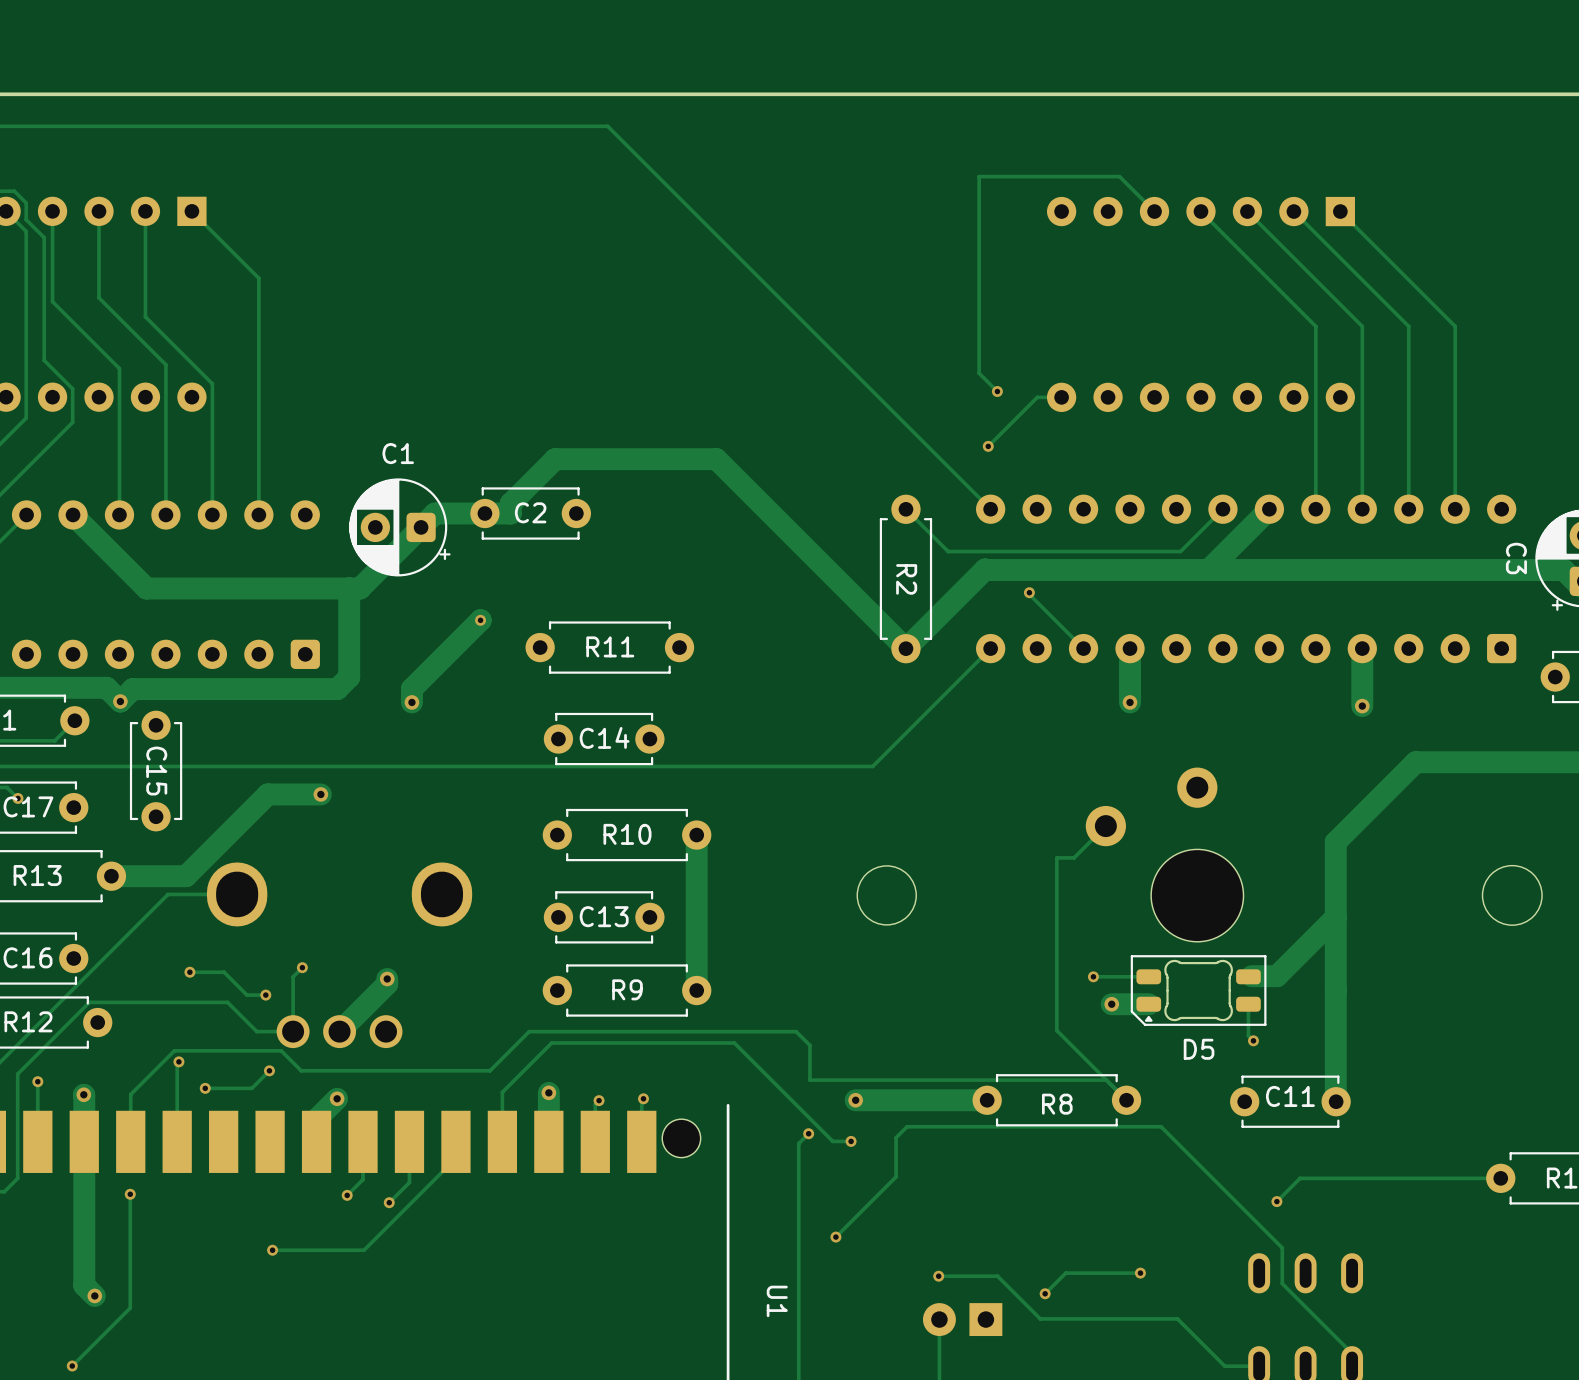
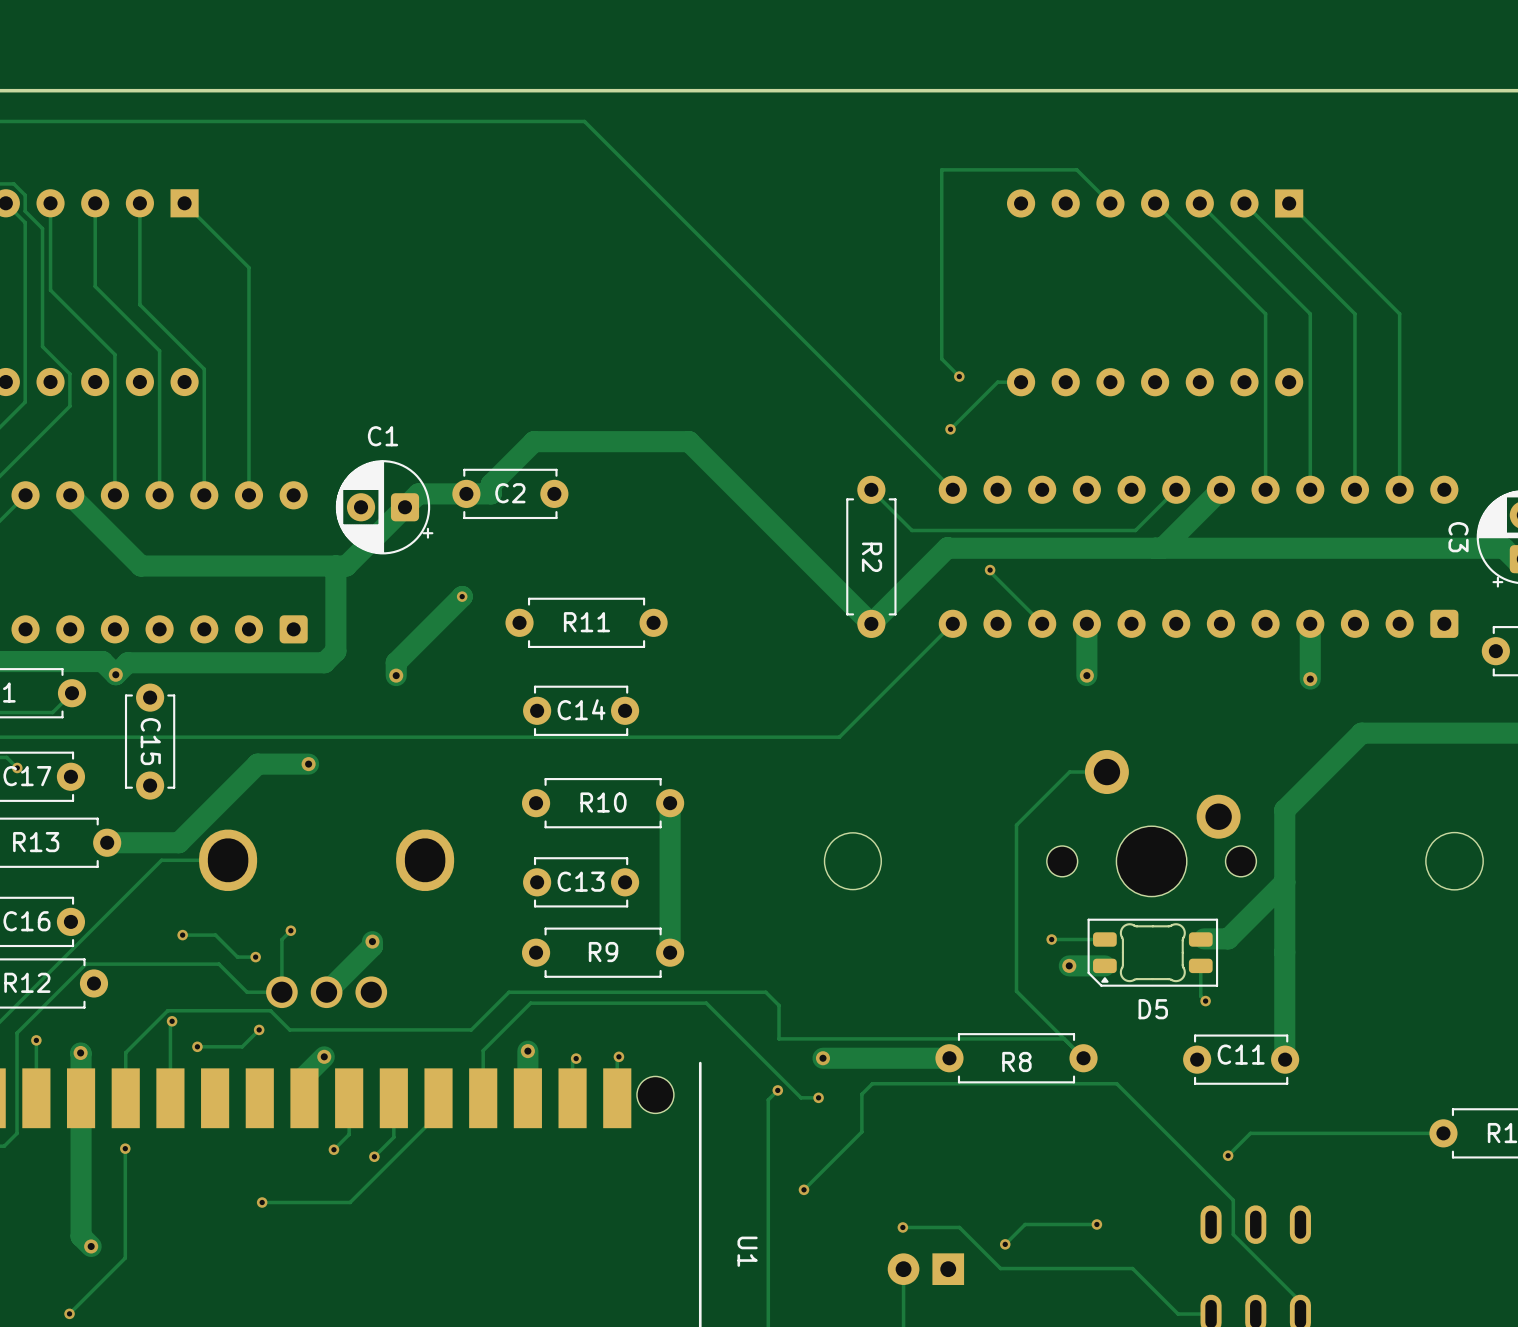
track: (1105, 826) (1074, 857) (1056, 857) -> (1106, 772) (1069, 772) (1016, 825)
part: (1164, 854) -> none
part: none -> (1151, 823)

